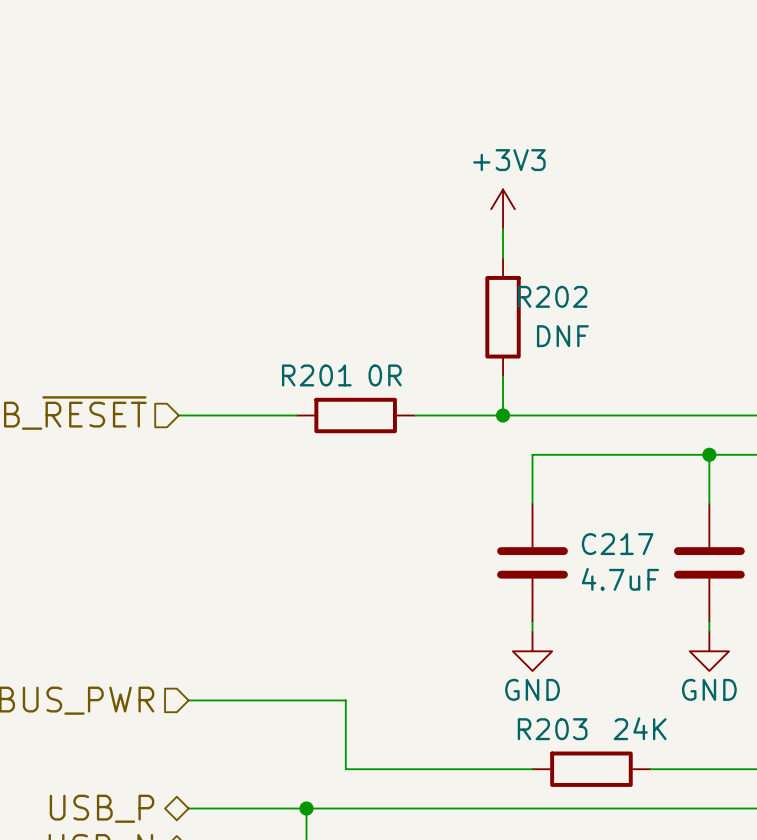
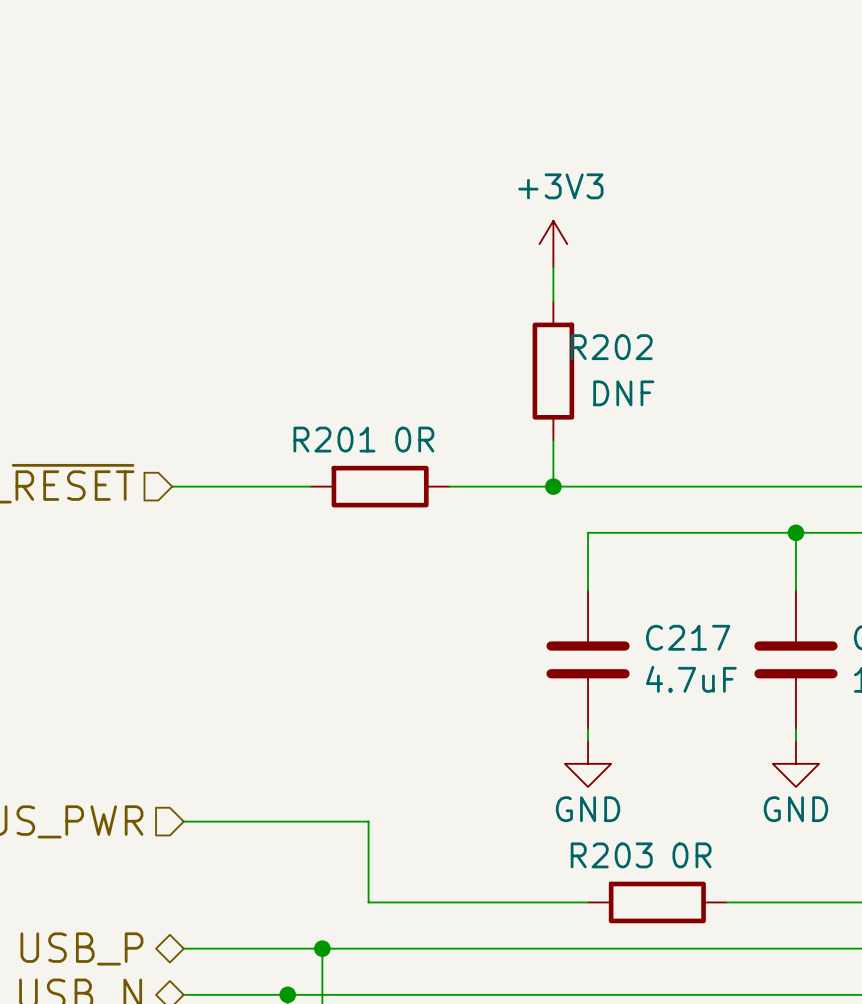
R203 value: 24K (640, 728) -> 0R (692, 855)

